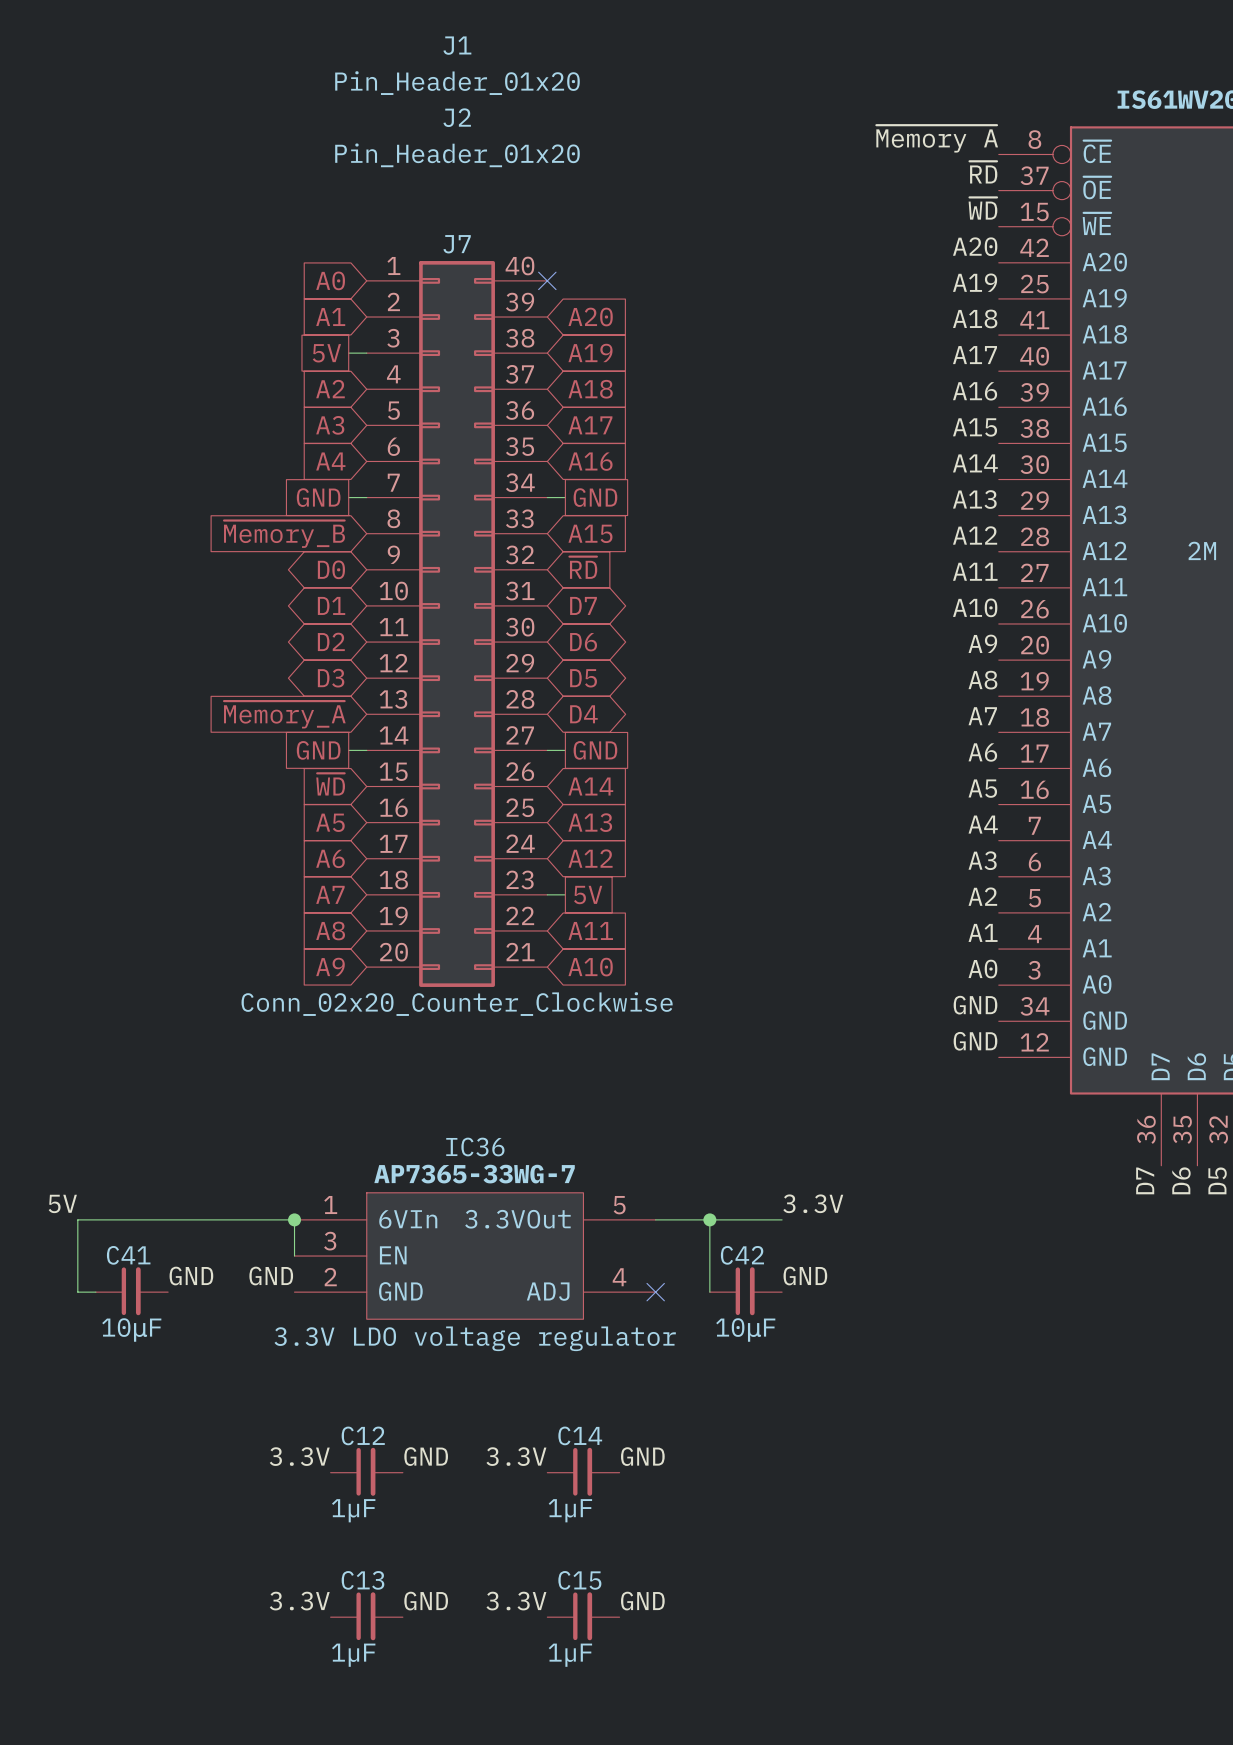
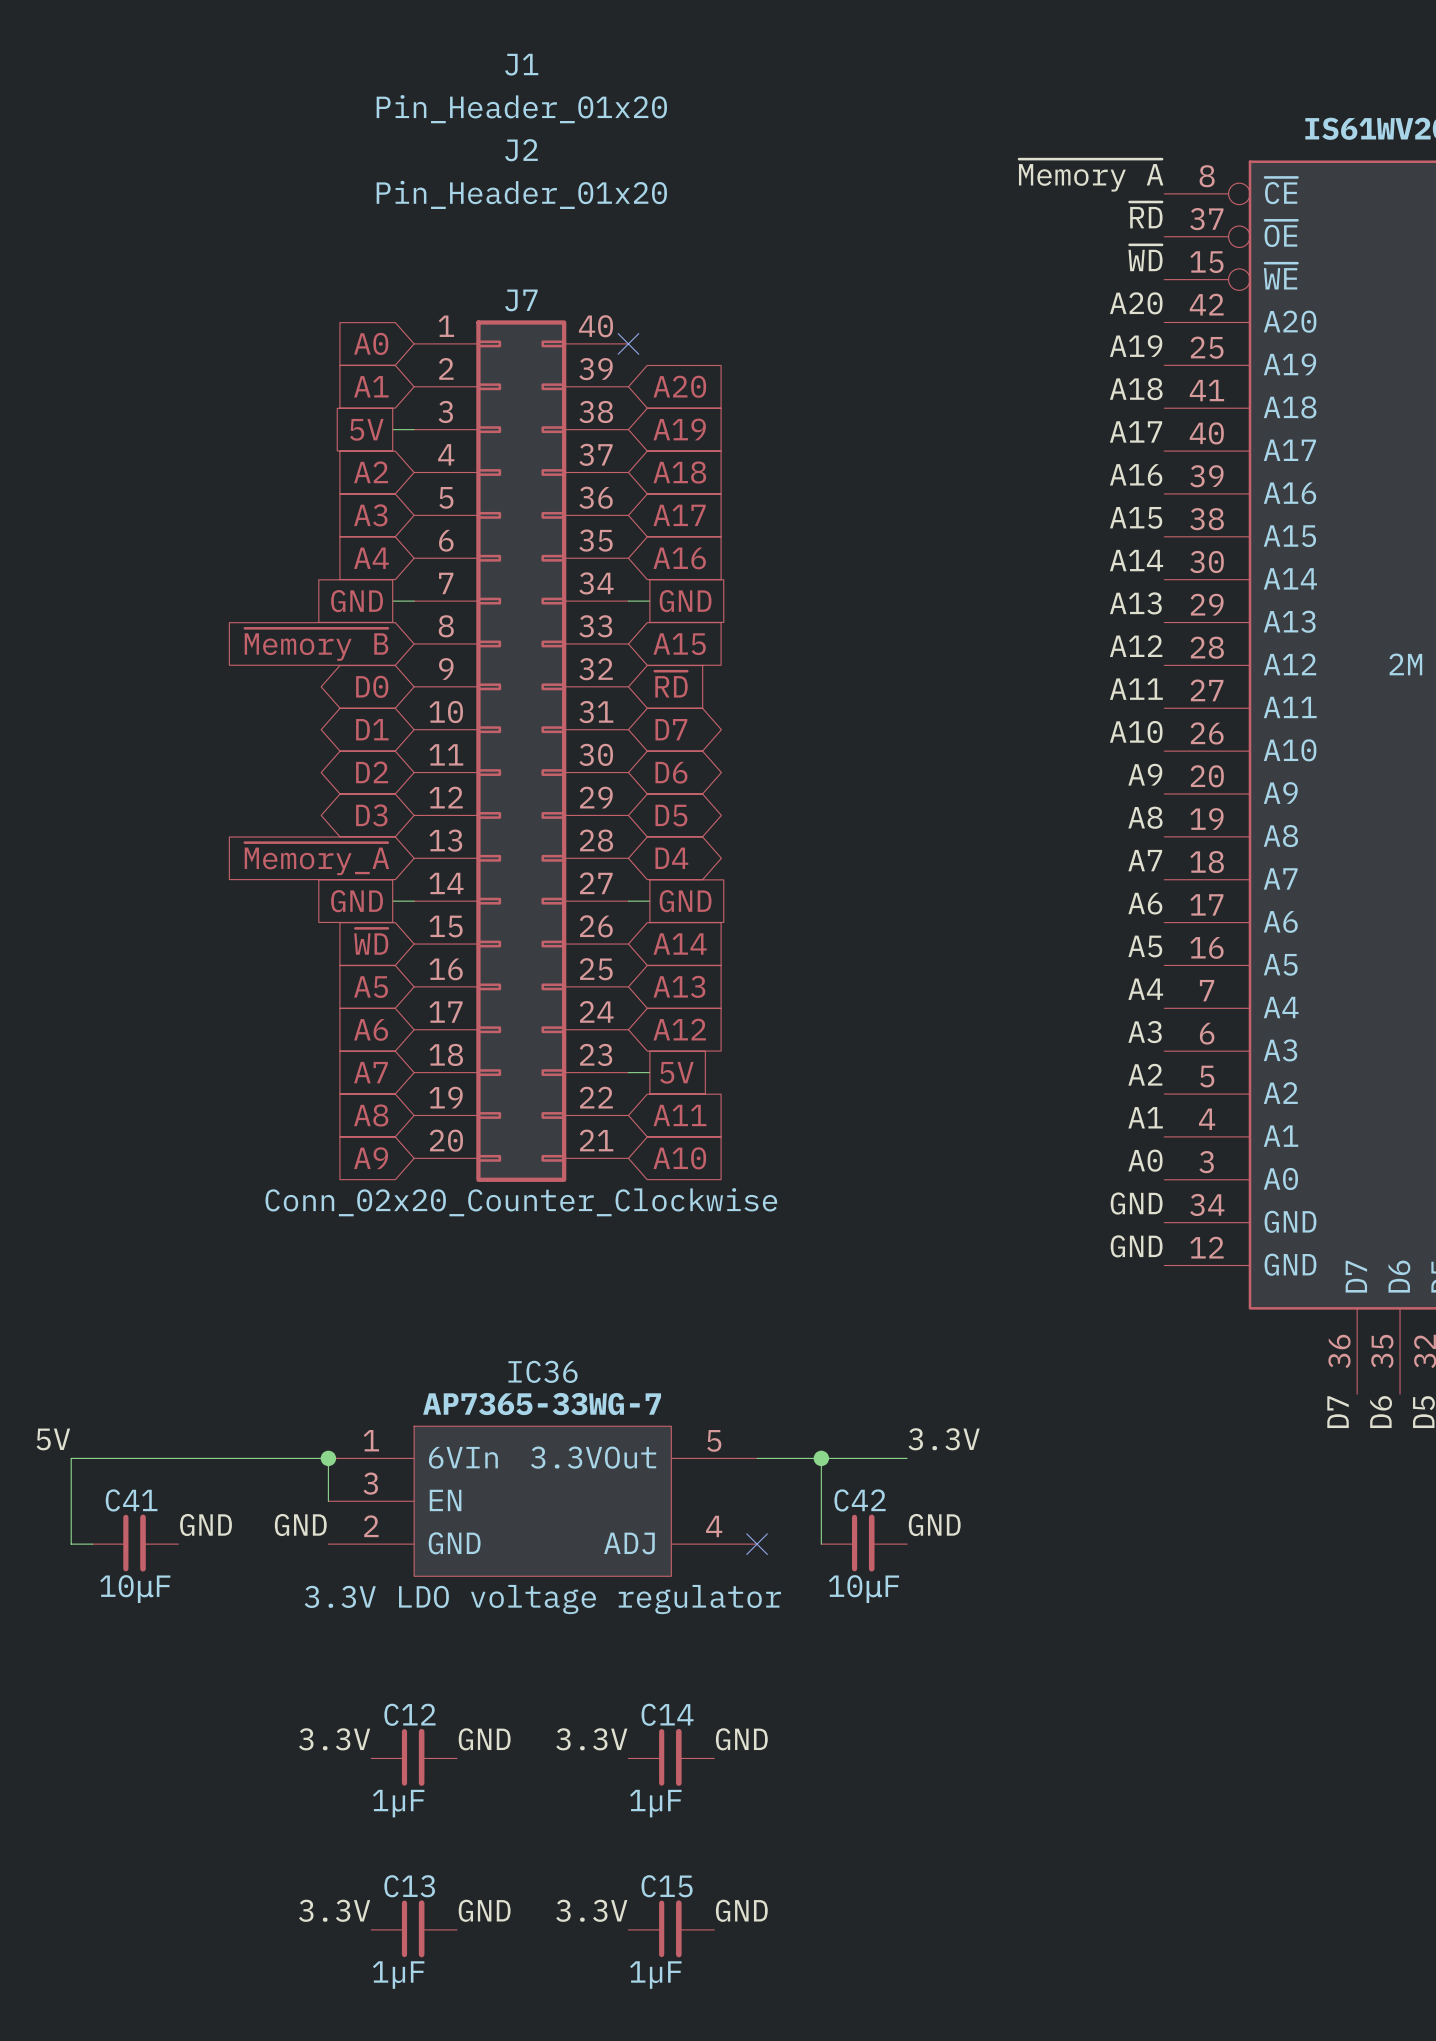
global label: ~{Memory_B} (284, 534) -> ~{Memory B} (316, 644)

